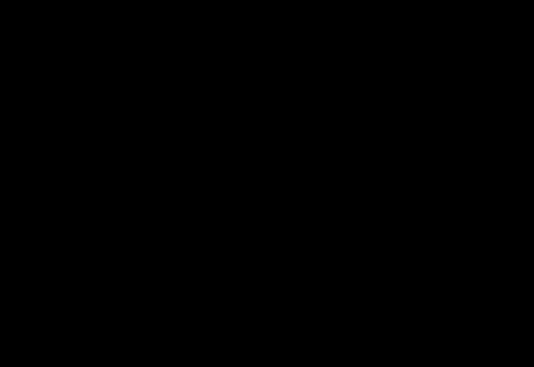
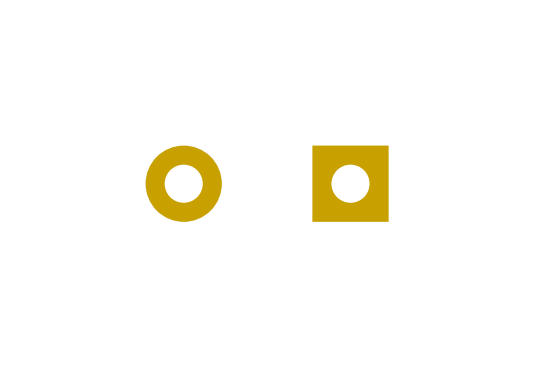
part: none -> (267, 183)

